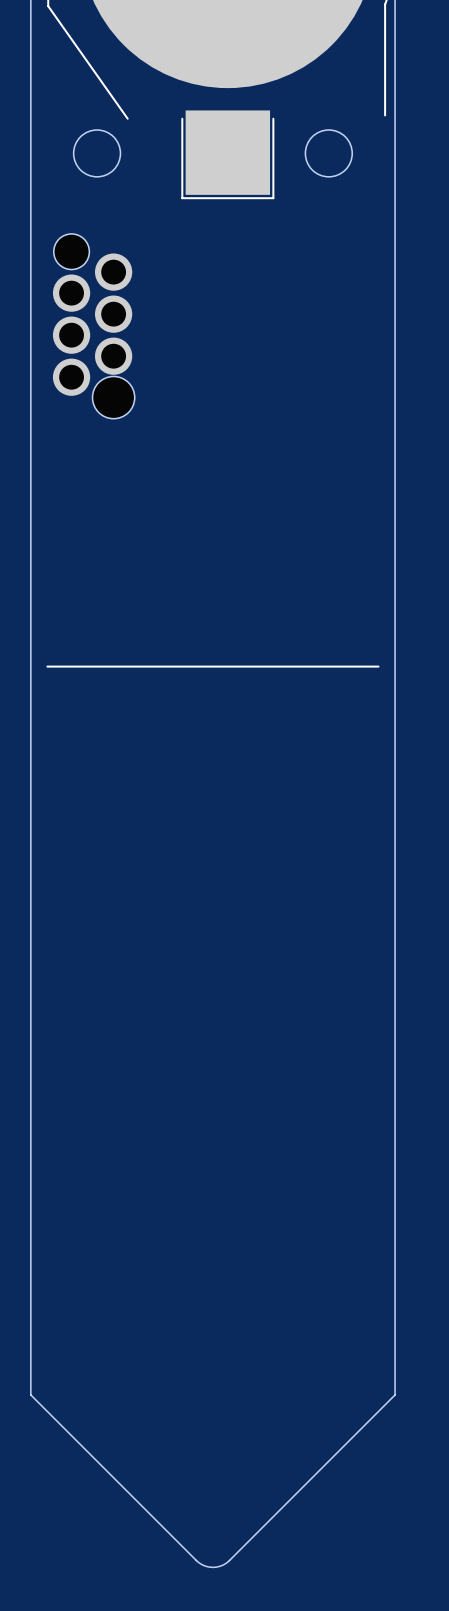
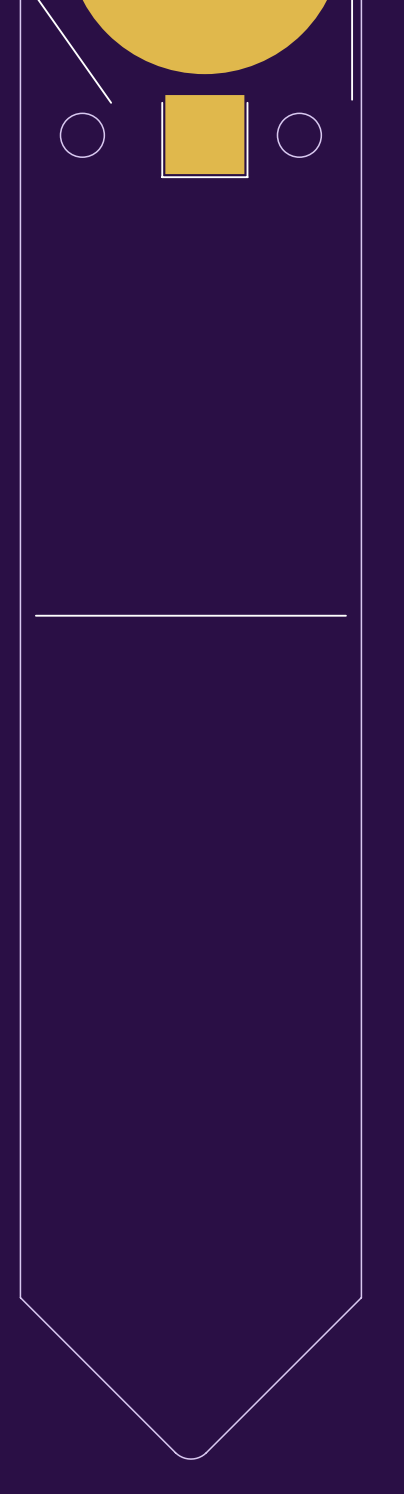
part: (93, 326) -> none

